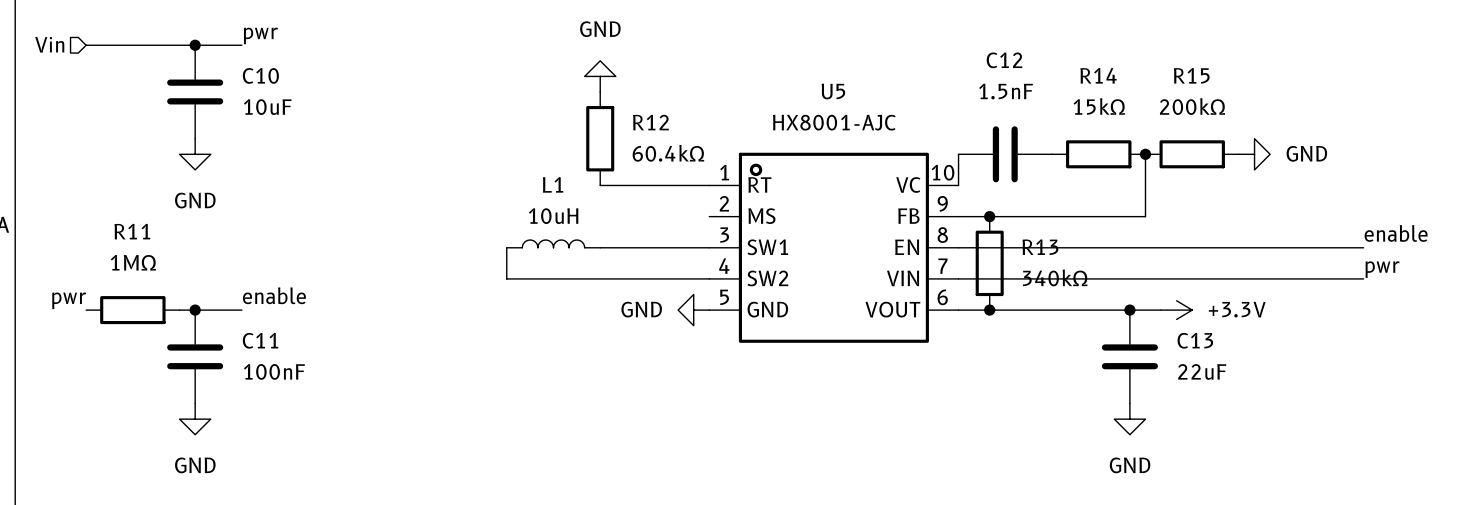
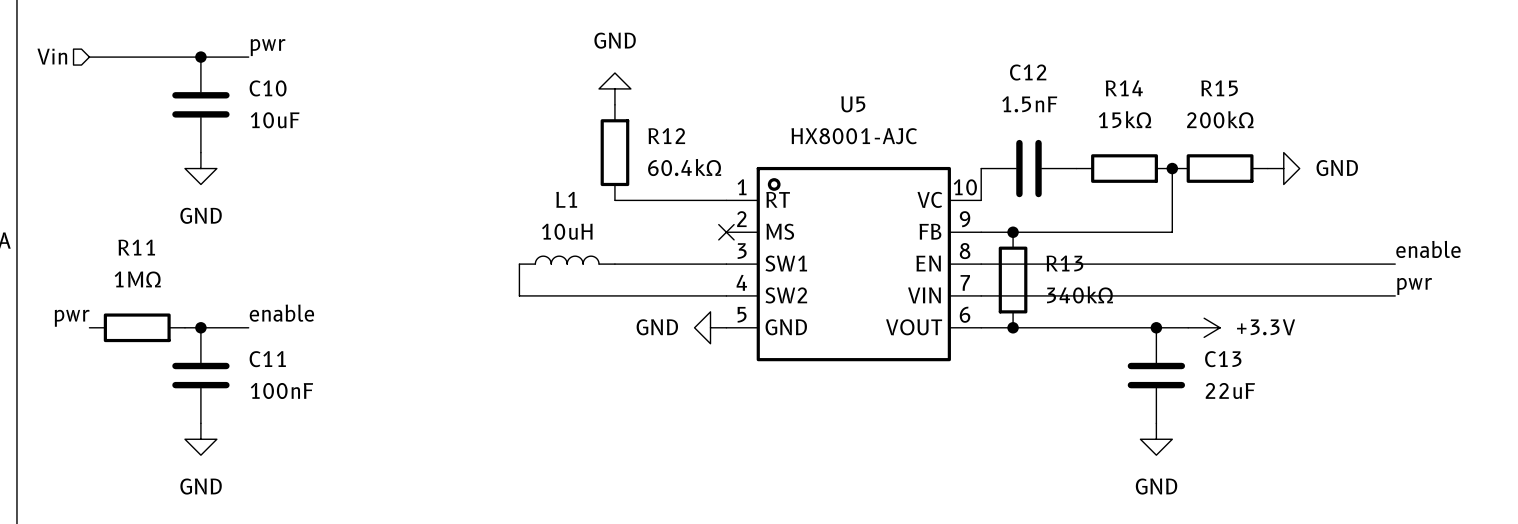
no-connect mark: none -> (726, 232)

